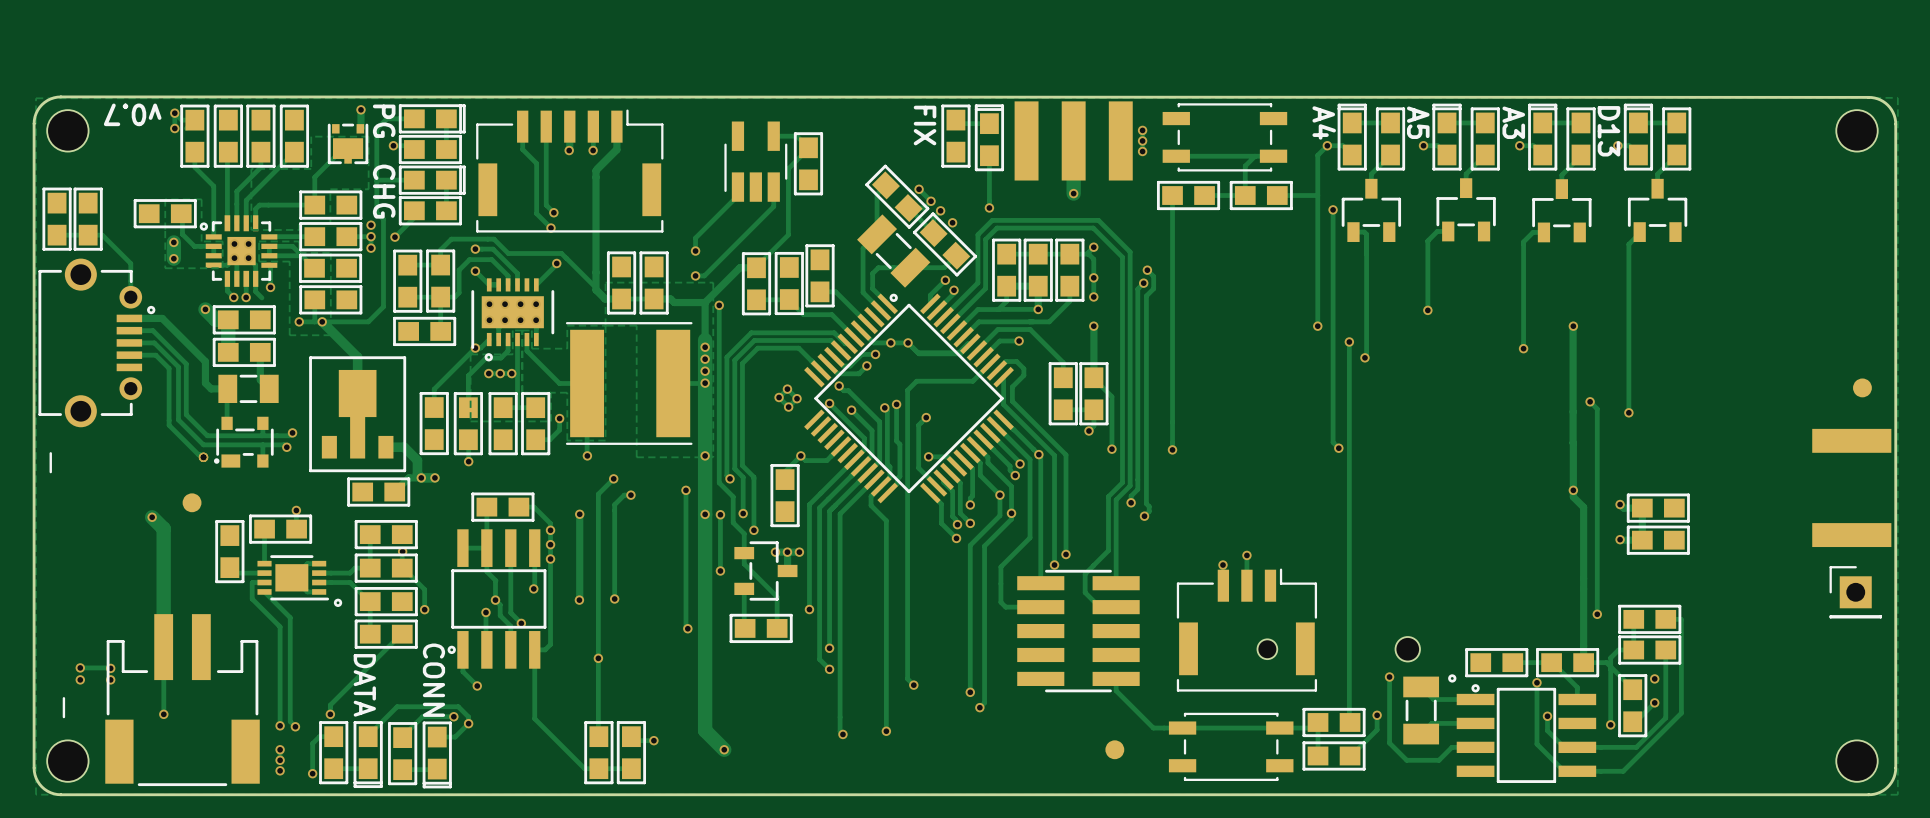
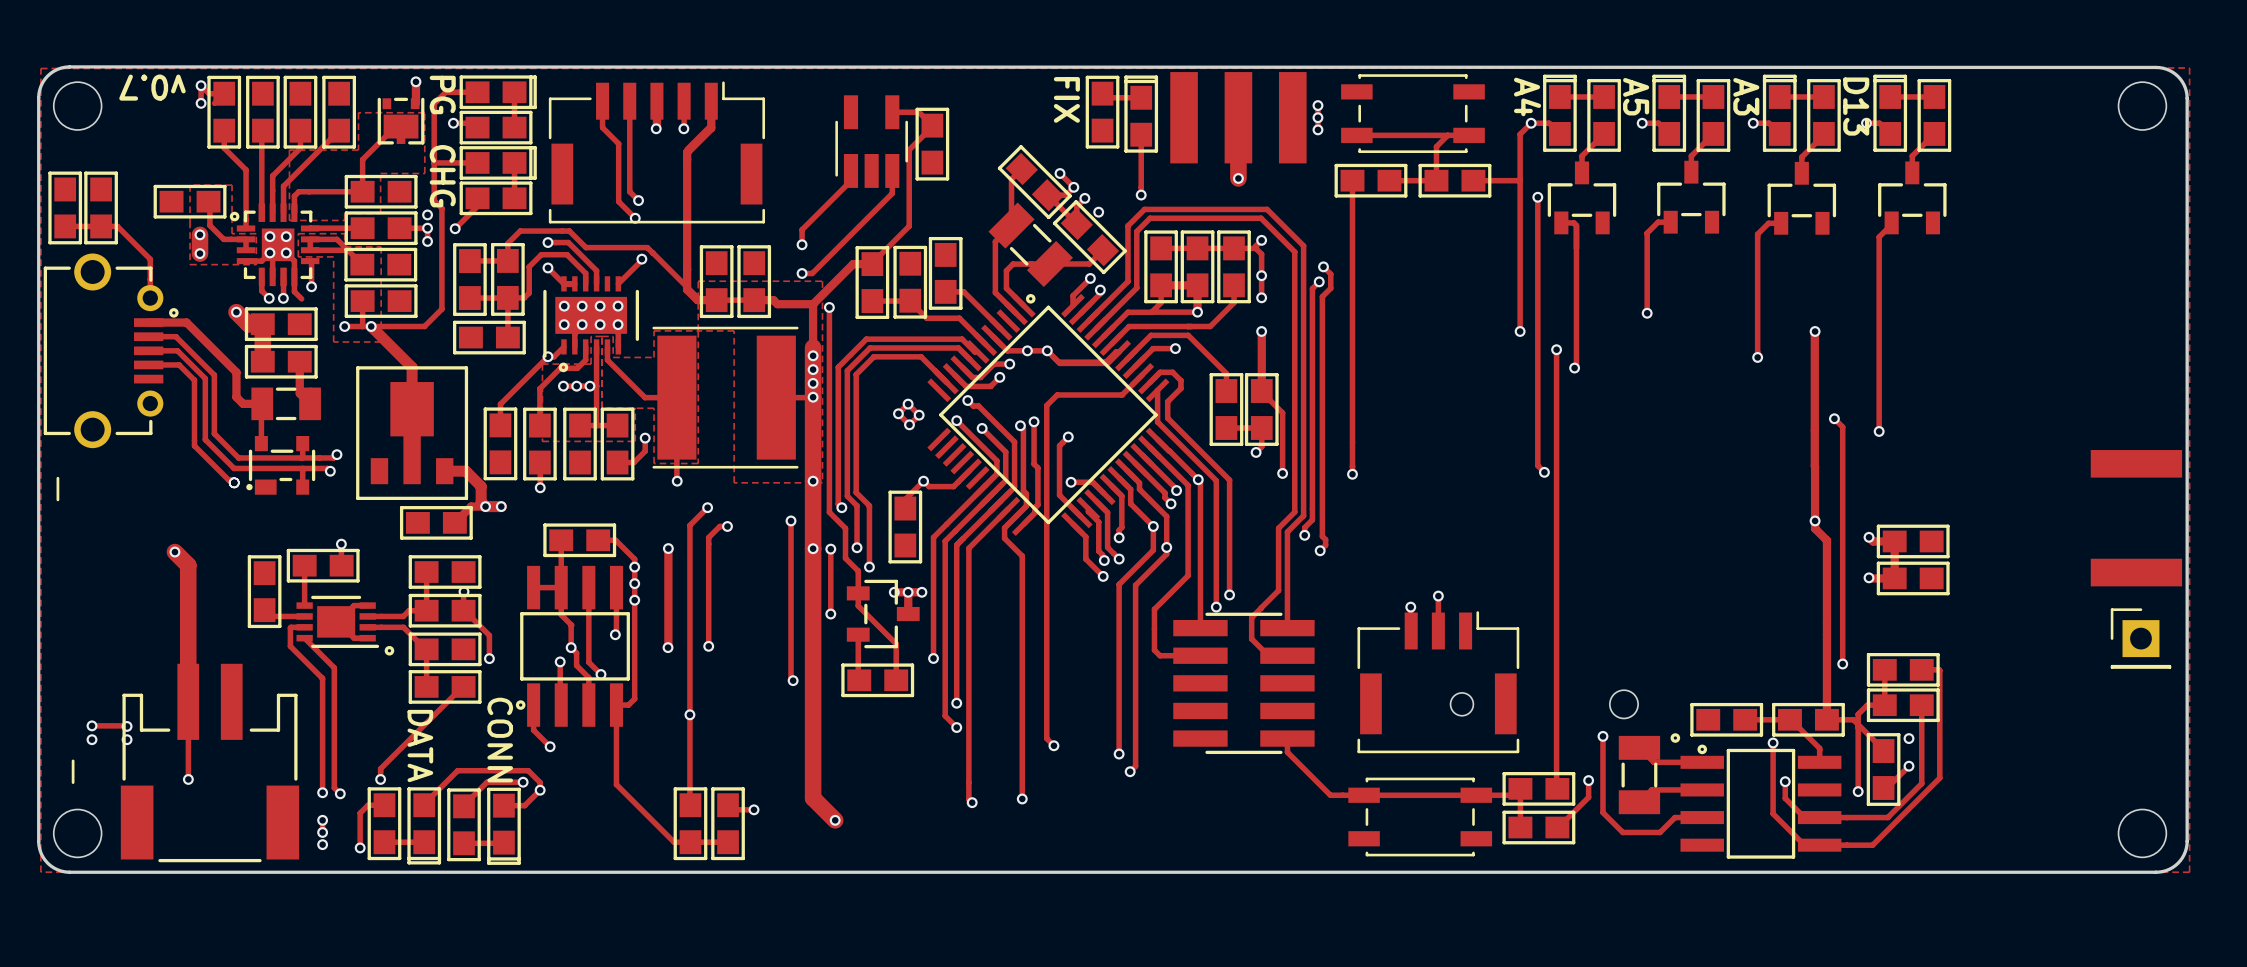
part: (1862, 387) -> none
part: (192, 502) -> none
part: (1114, 749) -> none

